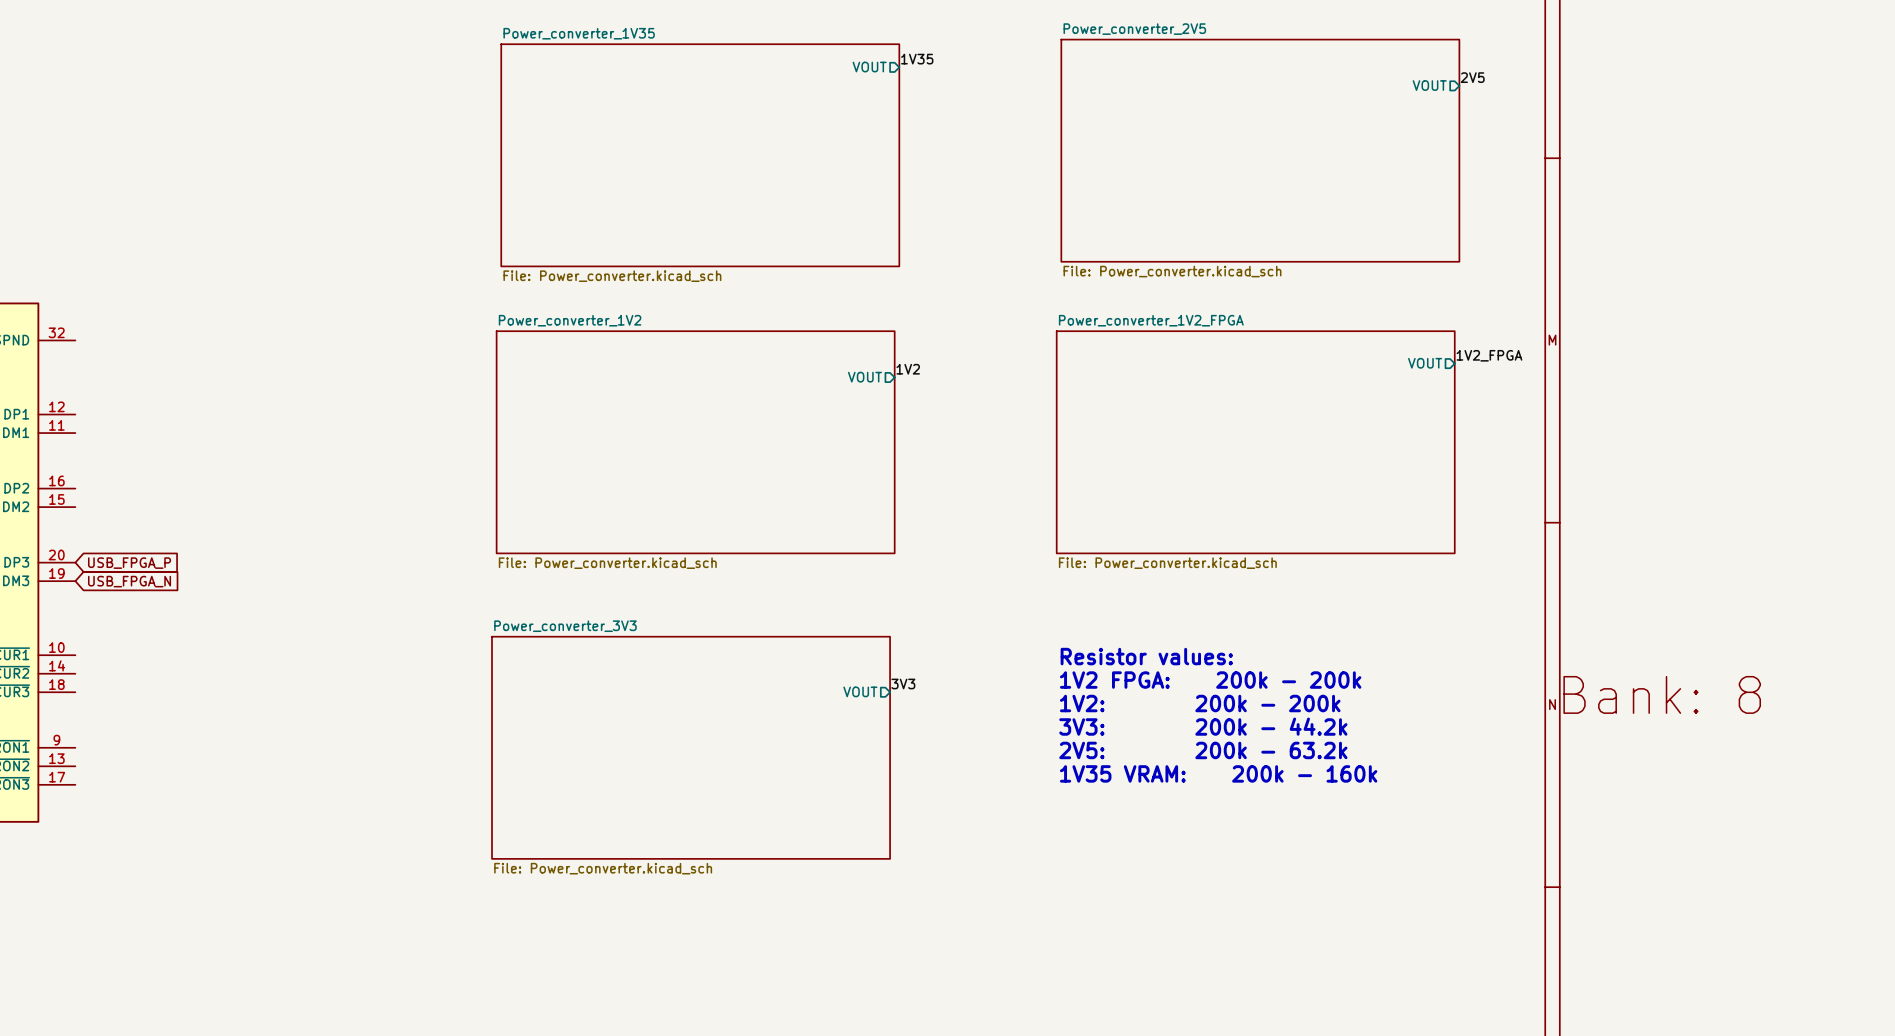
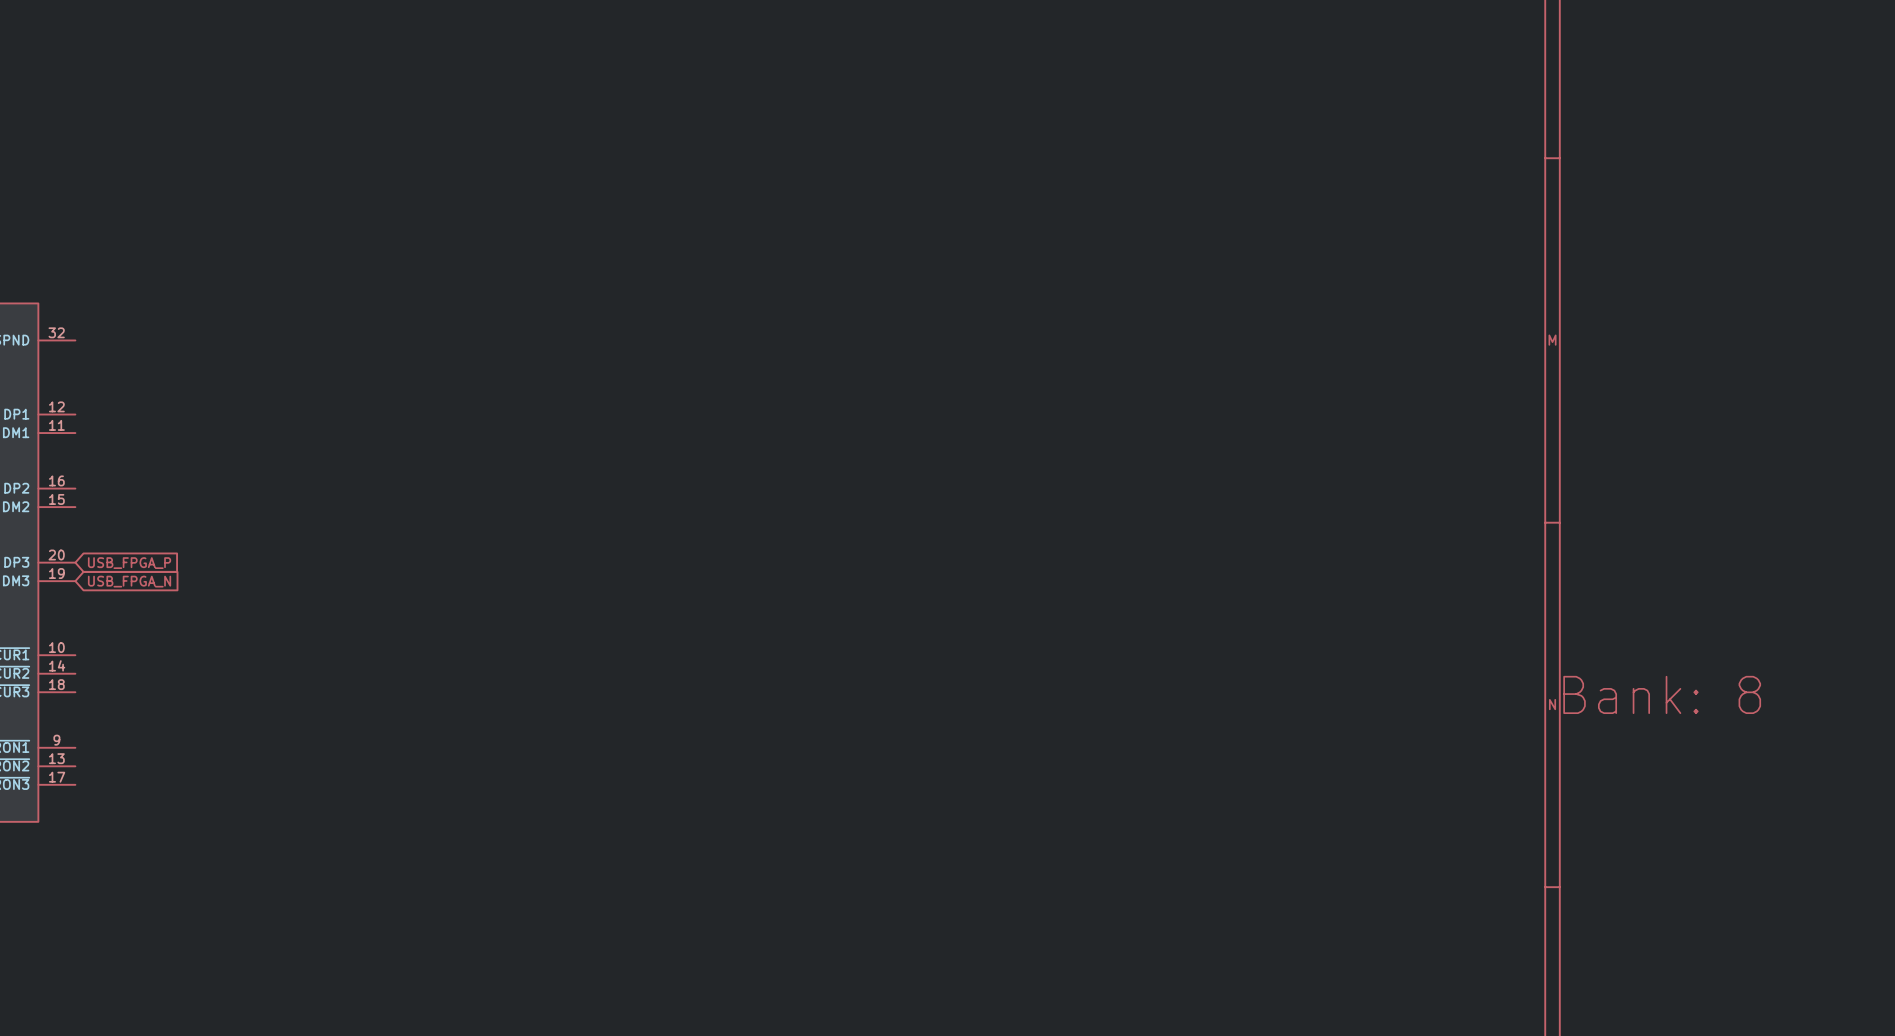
label: 1V35 (917, 59) -> none
sheet pin: VOUT (869, 67) -> none
label: 2V5 (1472, 77) -> none
sheet pin: VOUT (1429, 85) -> none
sheet Power_converter_2V5: File: Power_converter.kicad_sch (1260, 150) -> none
sheet Power_converter_1V35: File: Power_converter.kicad_sch (700, 155) -> none
label: 1V2_FPGA (1489, 355) -> none
sheet pin: VOUT (1425, 363) -> none
label: 1V2 (908, 369) -> none
sheet pin: VOUT (865, 377) -> none
sheet Power_converter_1V2: File: Power_converter.kicad_sch (695, 442) -> none
sheet Power_converter_1V2_FPGA: File: Power_converter.kicad_sch (1255, 442) -> none
text: Resistor values: (1146, 656) -> none
text: 1V2 FPGA: 200k - 200k (1210, 680) -> none
label: 3V3 (903, 683) -> none
sheet pin: VOUT (860, 691) -> none
text: 1V2: 200k - 200k (1200, 703) -> none
text: 3V3: 200k - 44.2k (1203, 726) -> none
sheet Power_converter_3V3: File: Power_converter.kicad_sch (691, 747) -> none
text: 2V5: 200k - 63.2k (1203, 750) -> none
text: 1V35 VRAM: 200k - 160k (1218, 773) -> none

